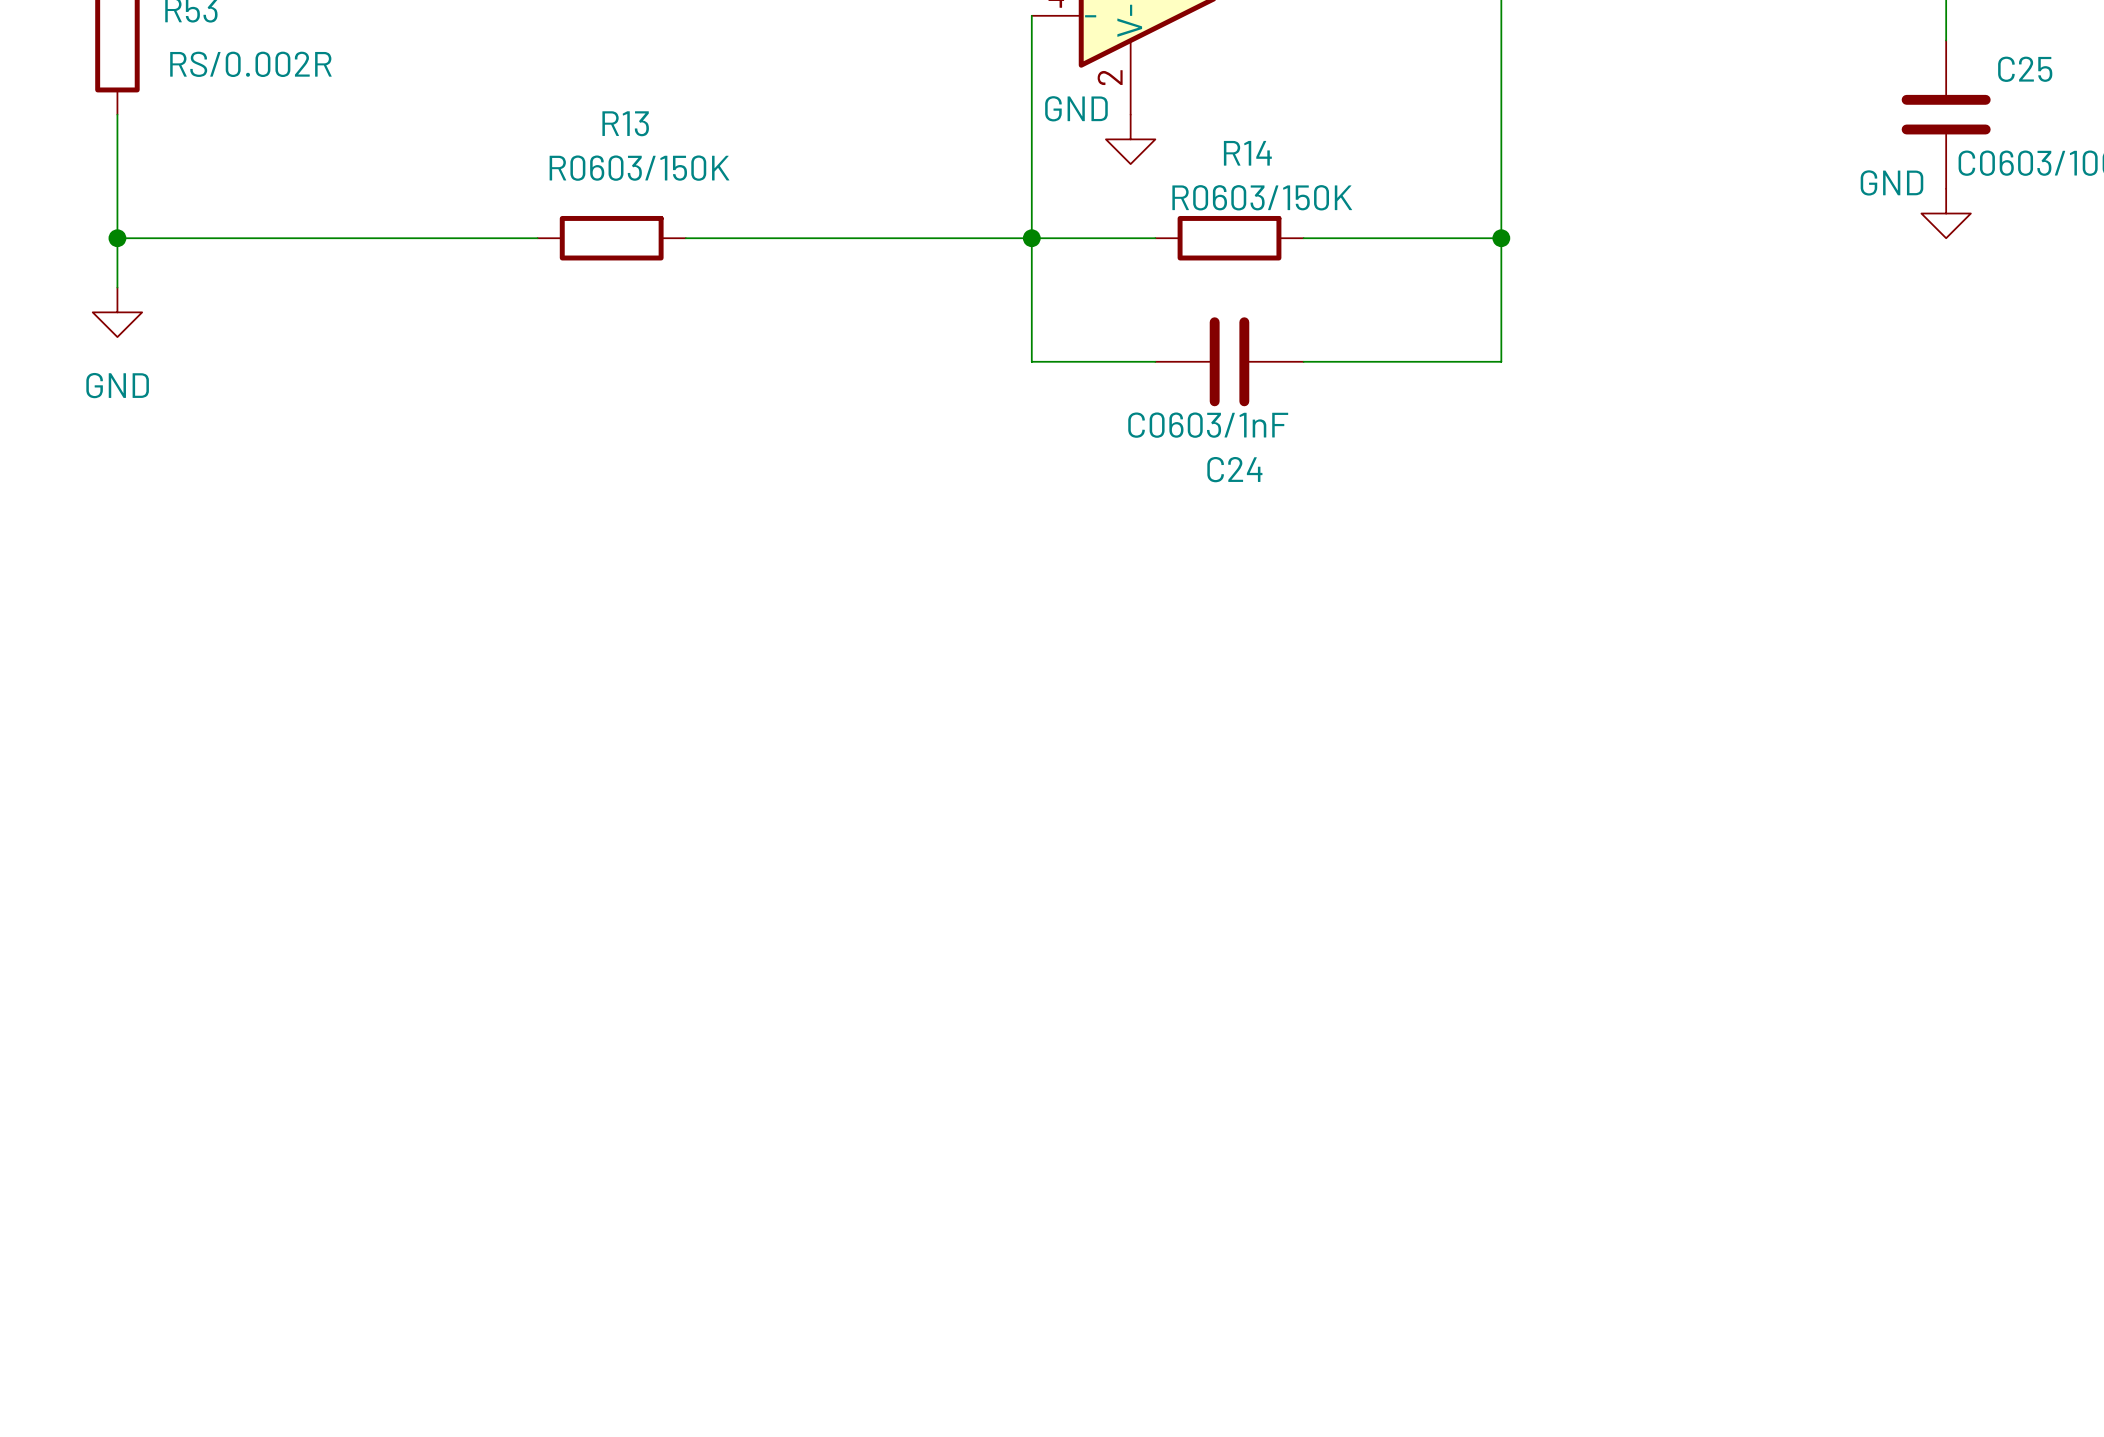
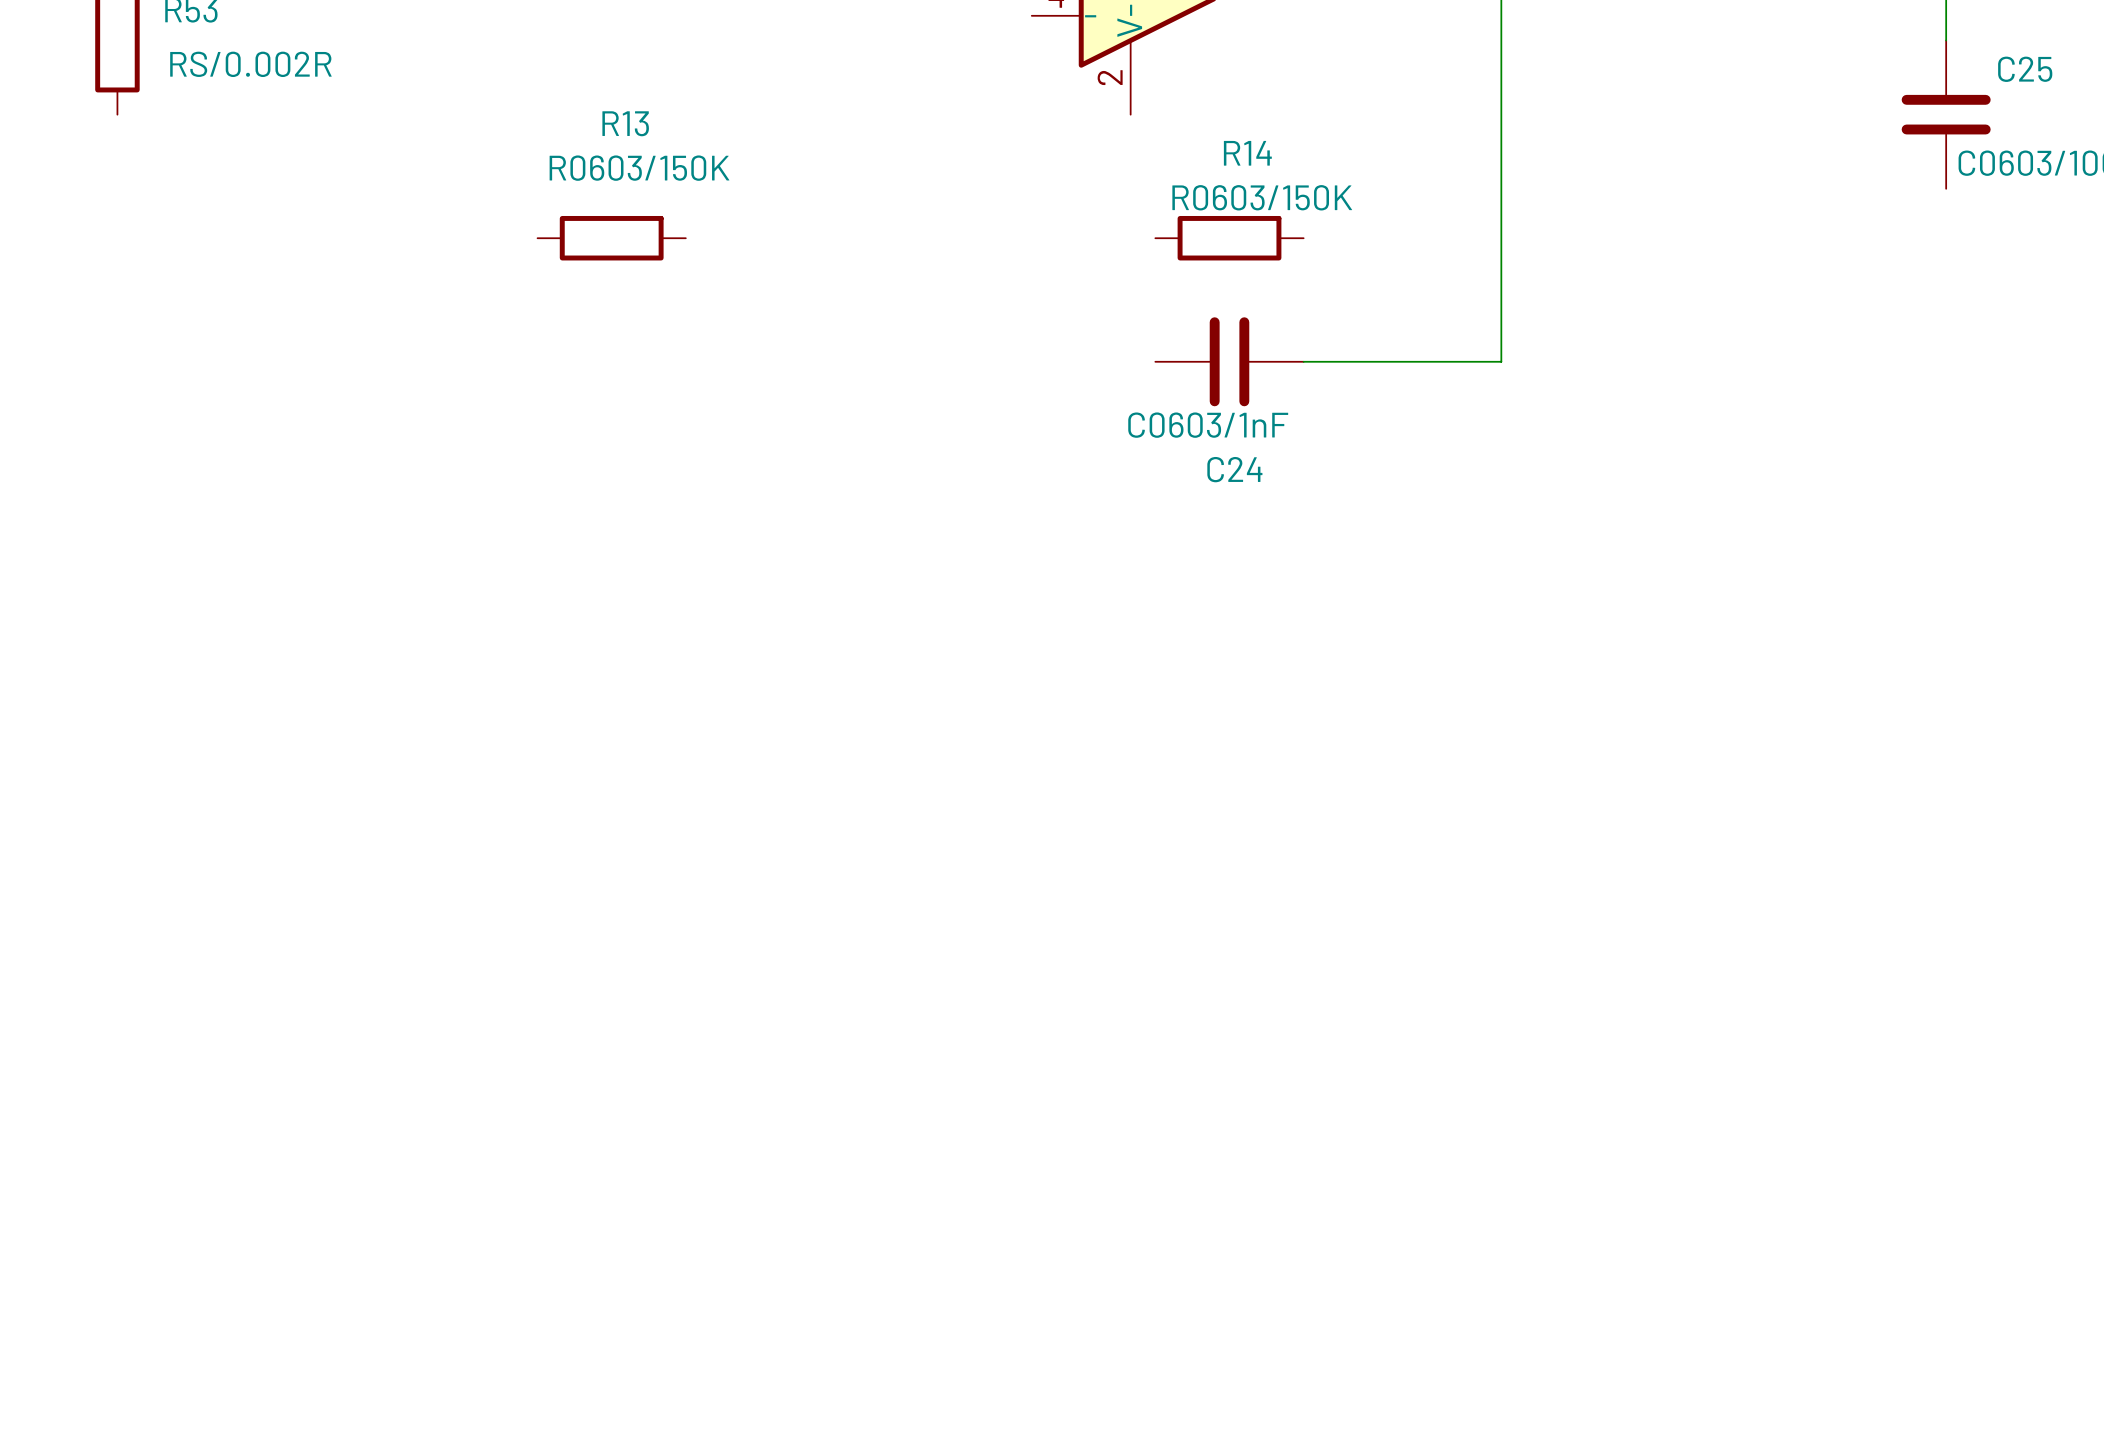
wire: (1031, 15) (1031, 361) (1155, 361) -> none
wire: (117, 114) (117, 287) -> none
power symbol: GND (1130, 139) -> none
power symbol: GND (1946, 213) -> none
wire: (117, 238) (537, 238) -> none
junction: (117, 238) -> none
wire: (685, 238) (1155, 238) -> none
junction: (1031, 238) -> none
wire: (1303, 238) (1501, 238) -> none
junction: (1501, 238) -> none
power symbol: GND (117, 312) -> none

